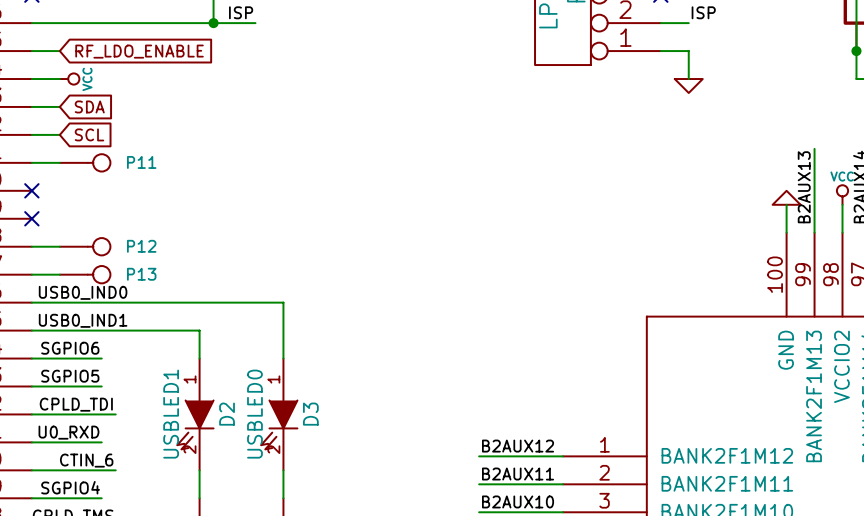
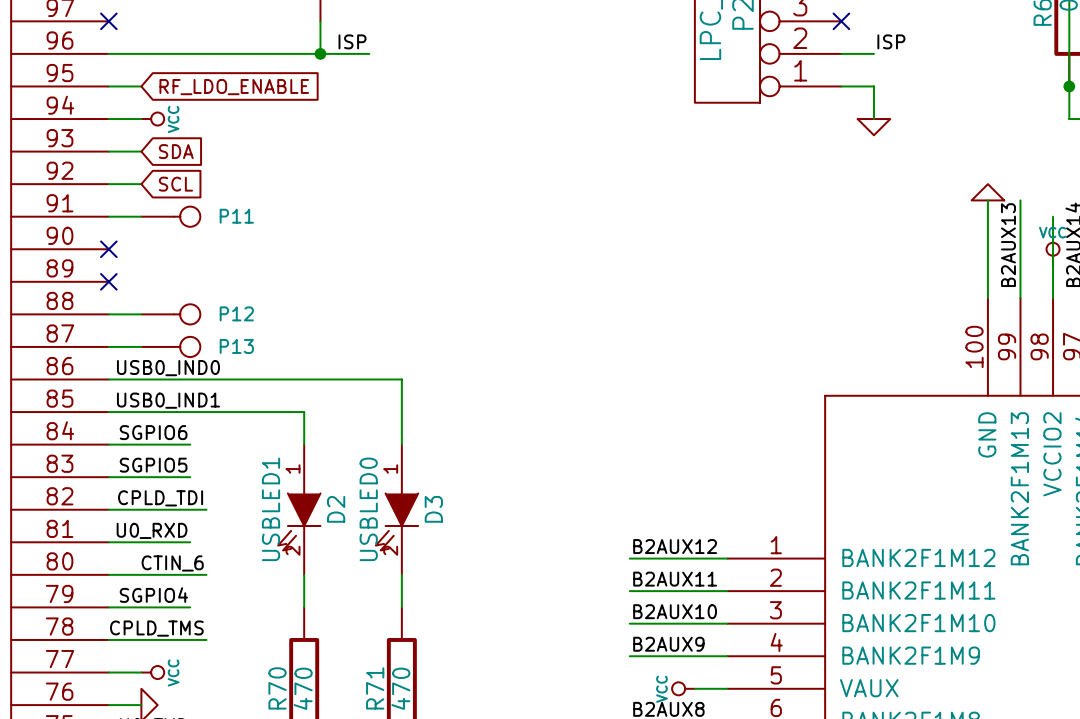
wire: none -> (987, 200) (987, 265)
wire: none -> (1053, 216) (1053, 265)
power symbol position: (786, 197) -> (987, 192)

